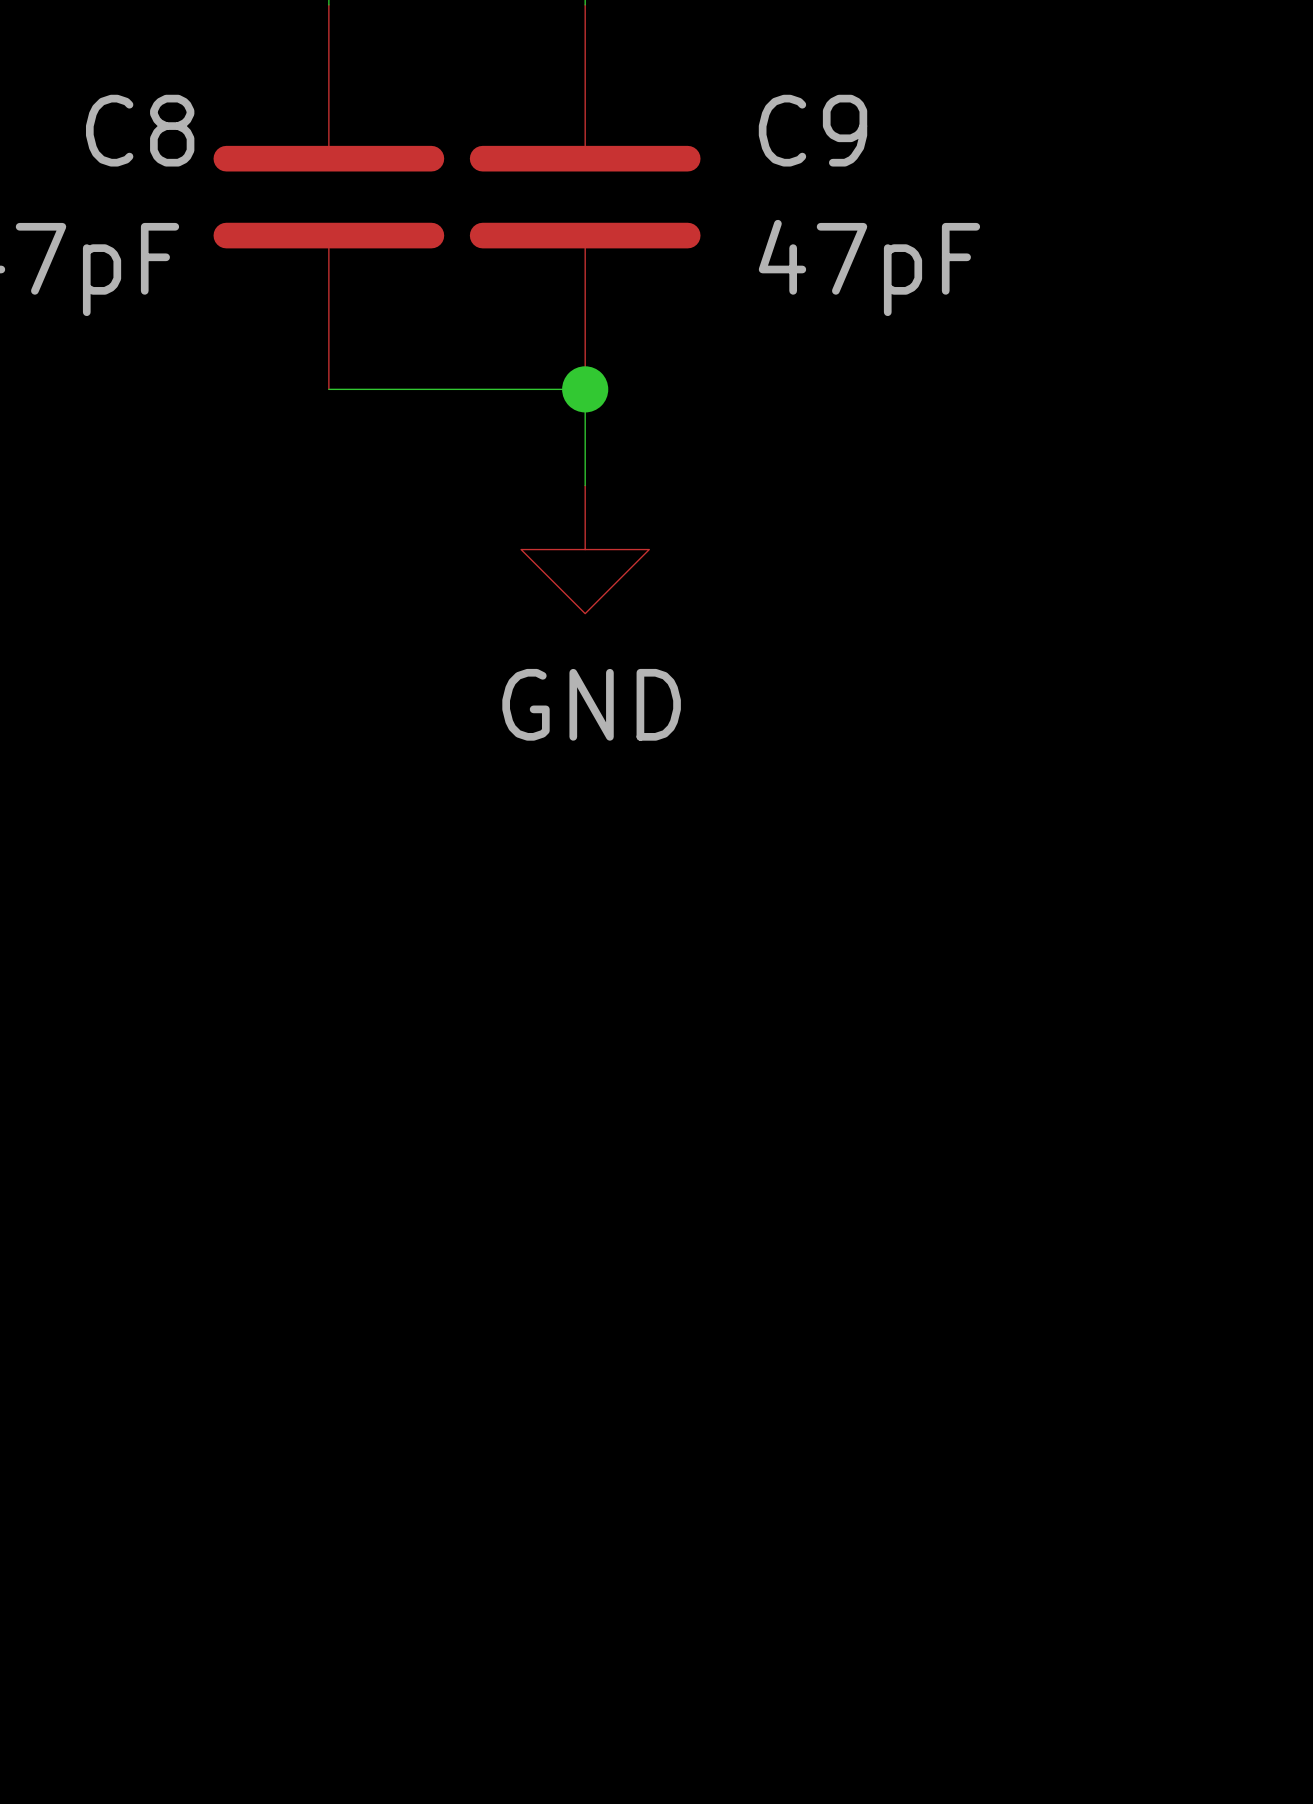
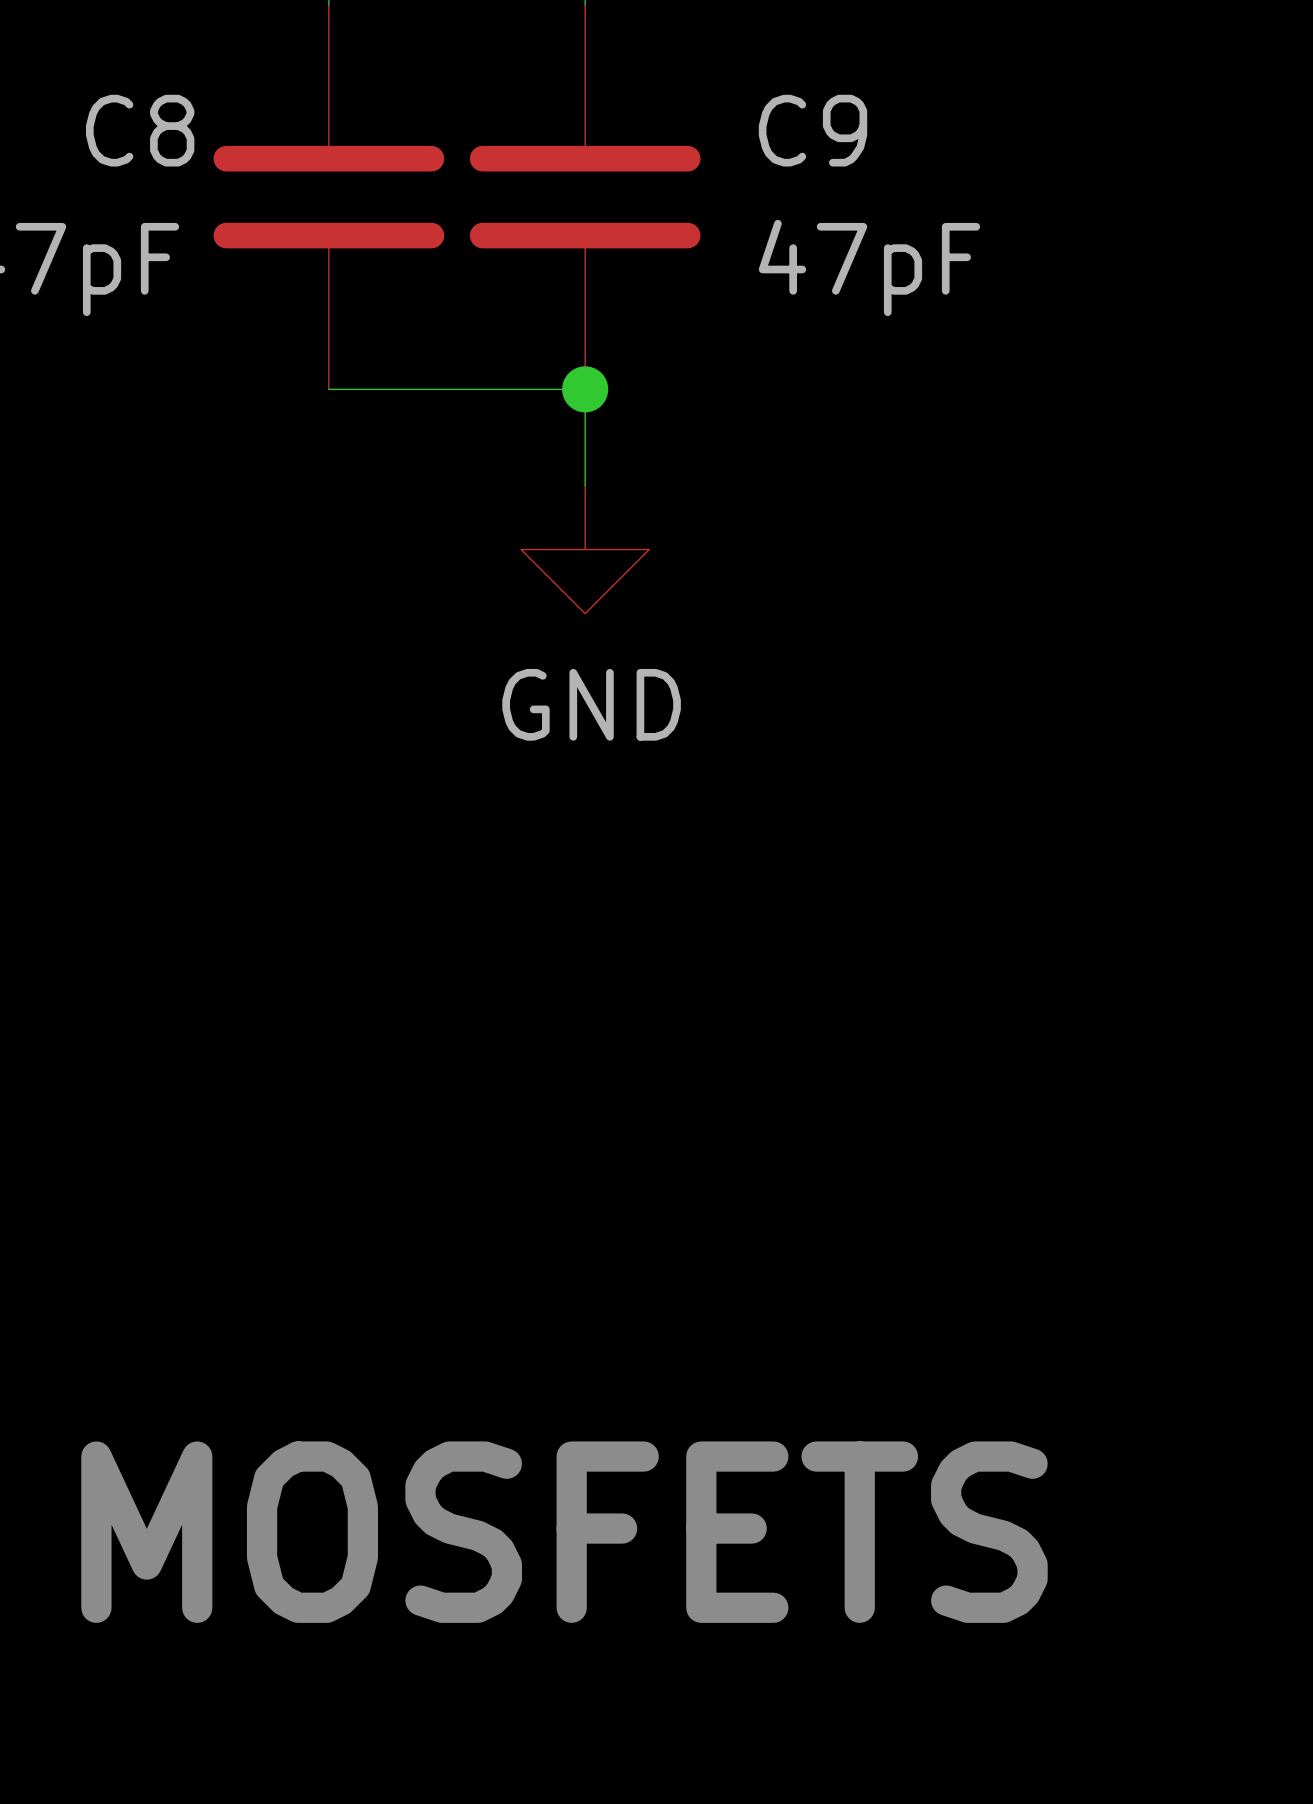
text: none -> MOSFETS (564, 1532)

